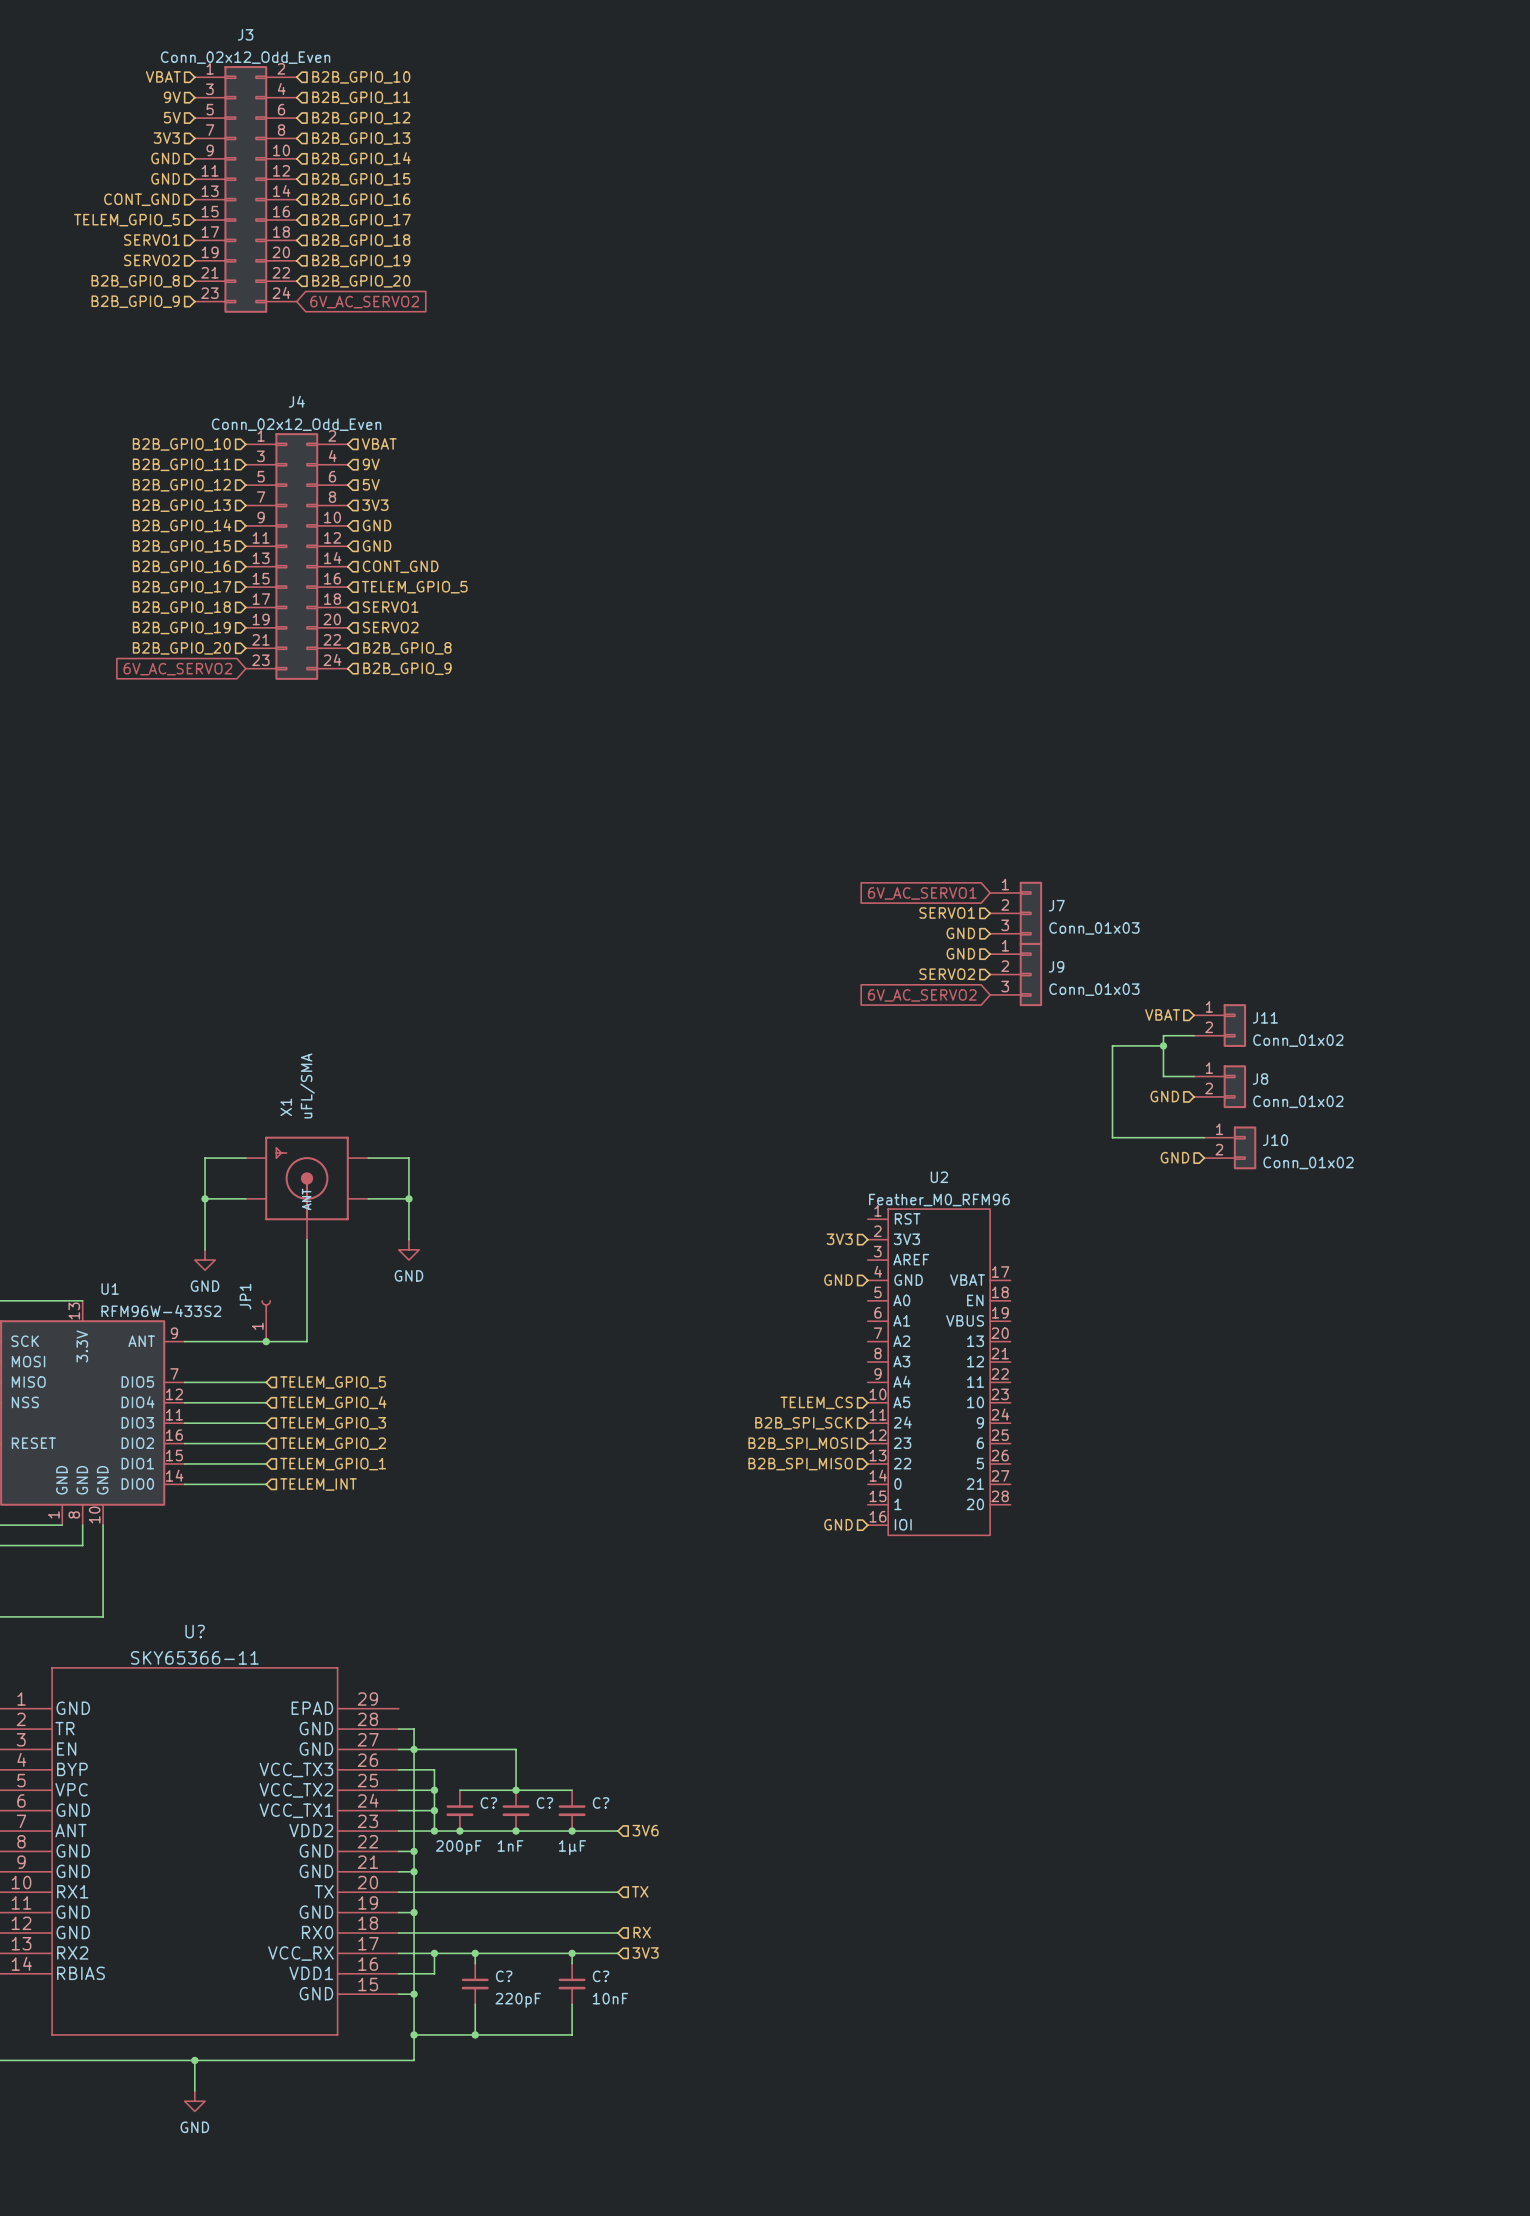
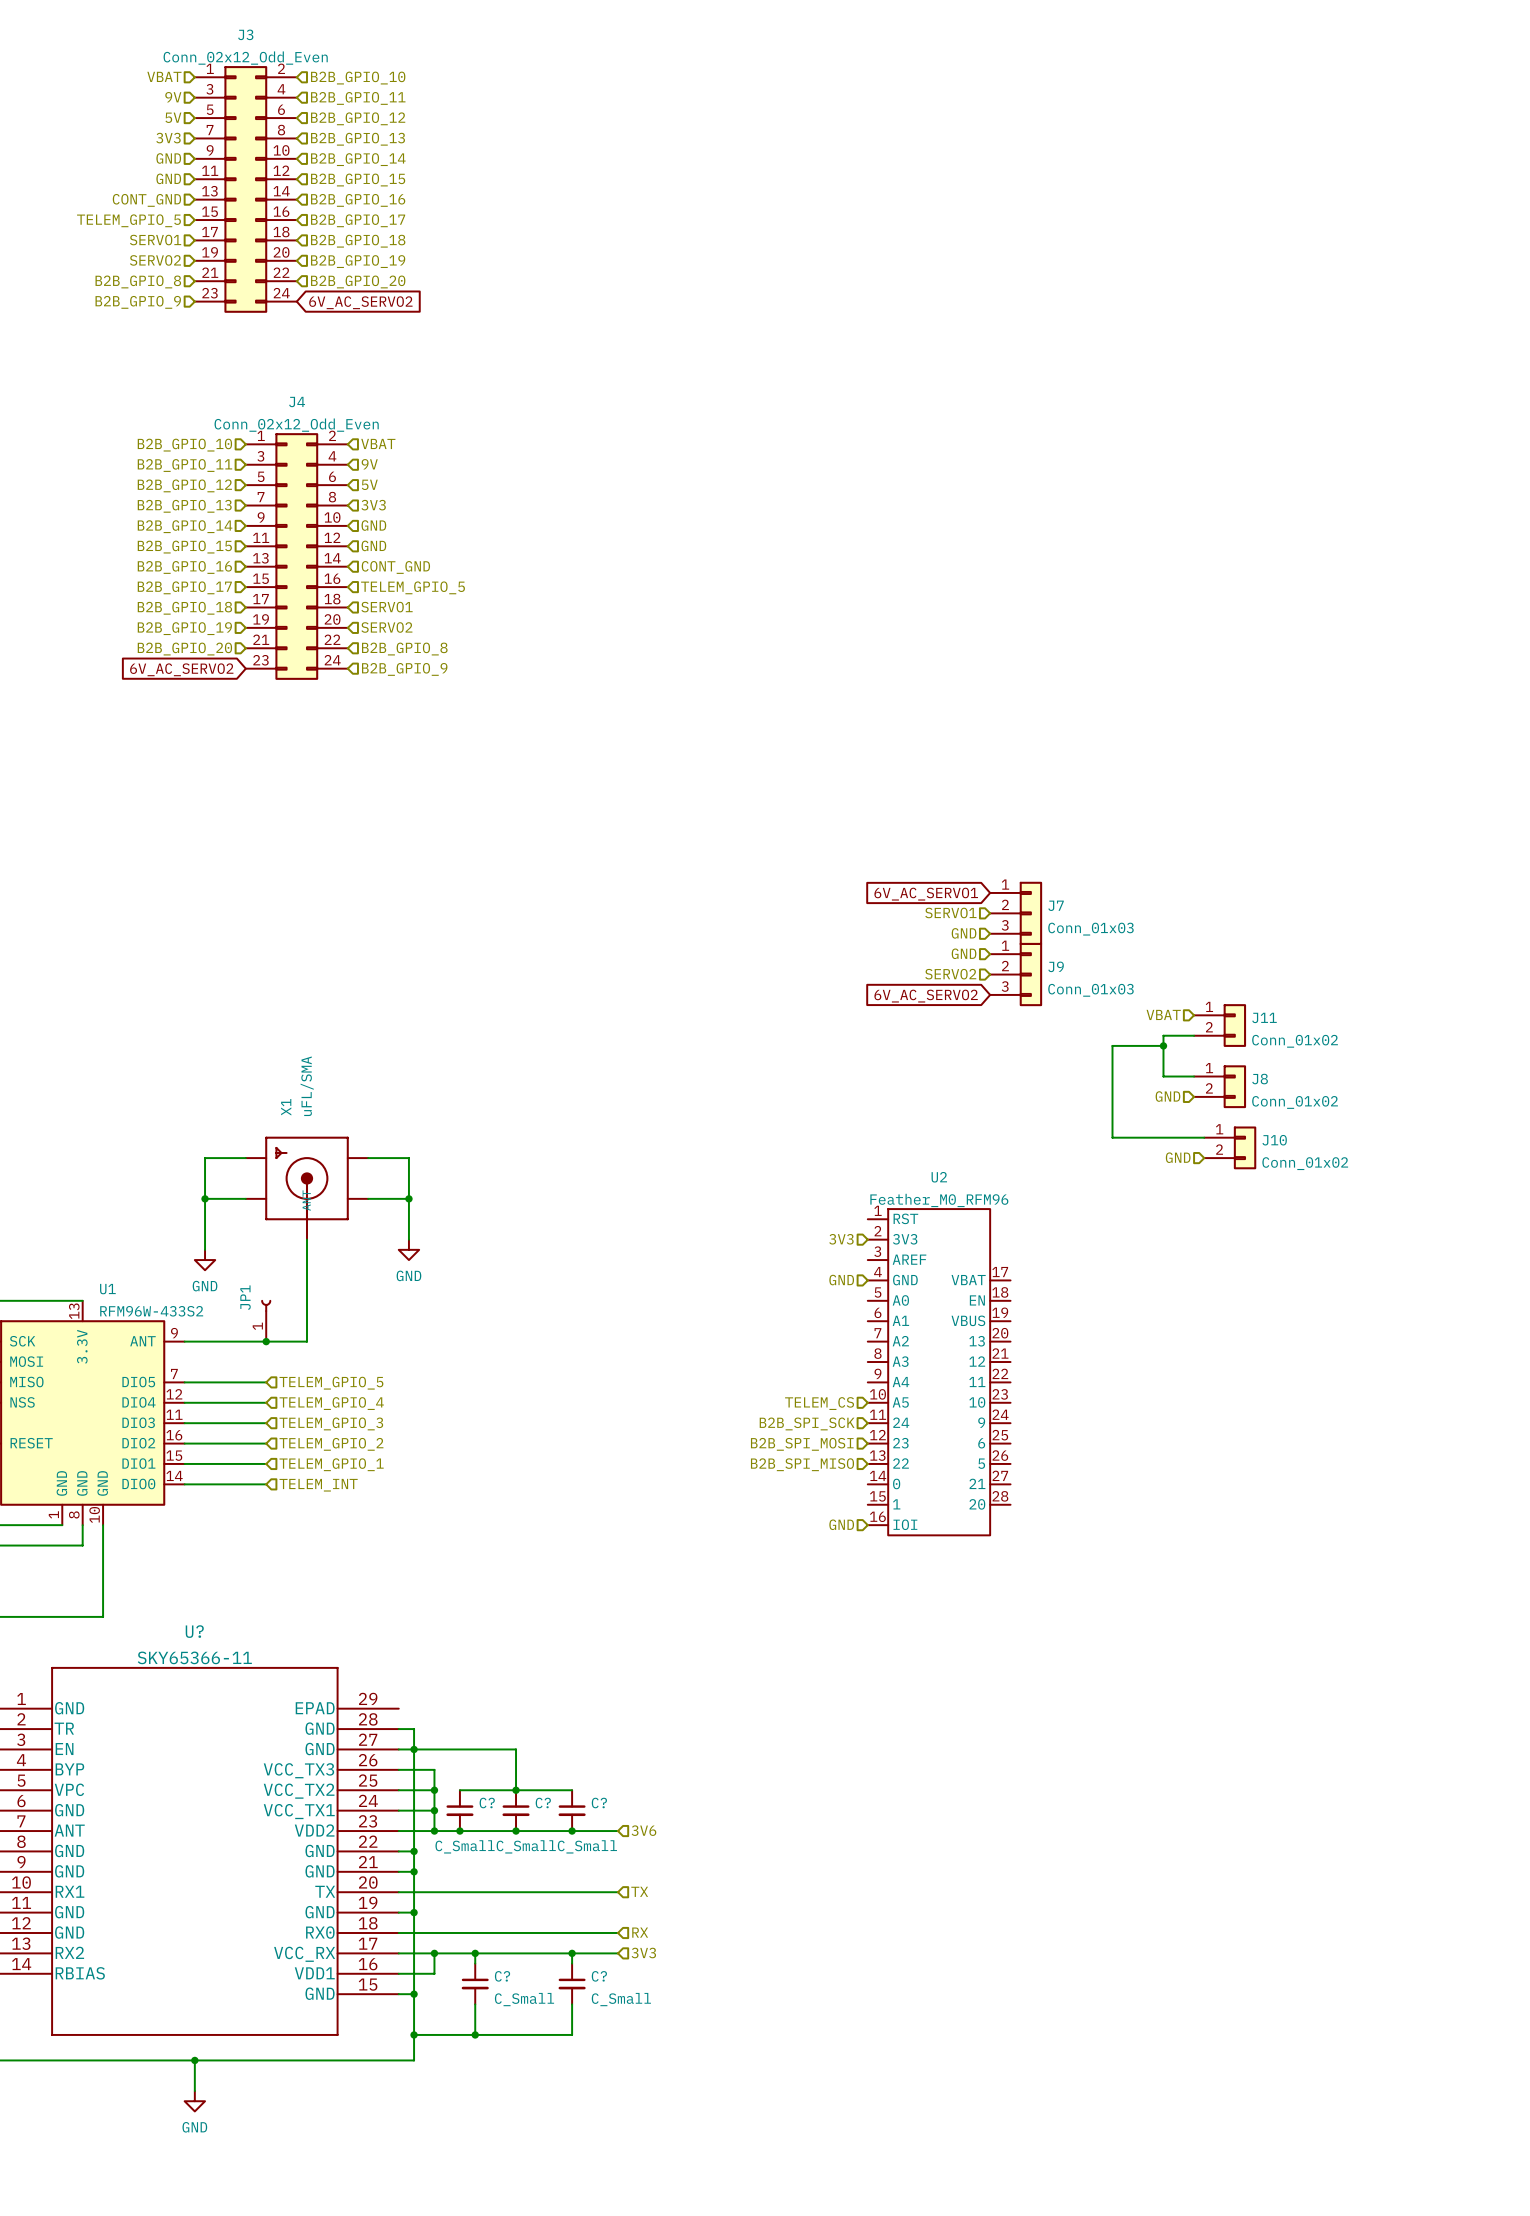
C? value: 1nF (510, 1845) -> C_Small (526, 1846)
C? value: 200pF (458, 1847) -> C_Small (465, 1846)
C? value: 1μF (572, 1847) -> C_Small (587, 1846)
C? value: 10nF (610, 1998) -> C_Small (621, 1999)
C? value: 220pF (518, 2000) -> C_Small (524, 1999)

